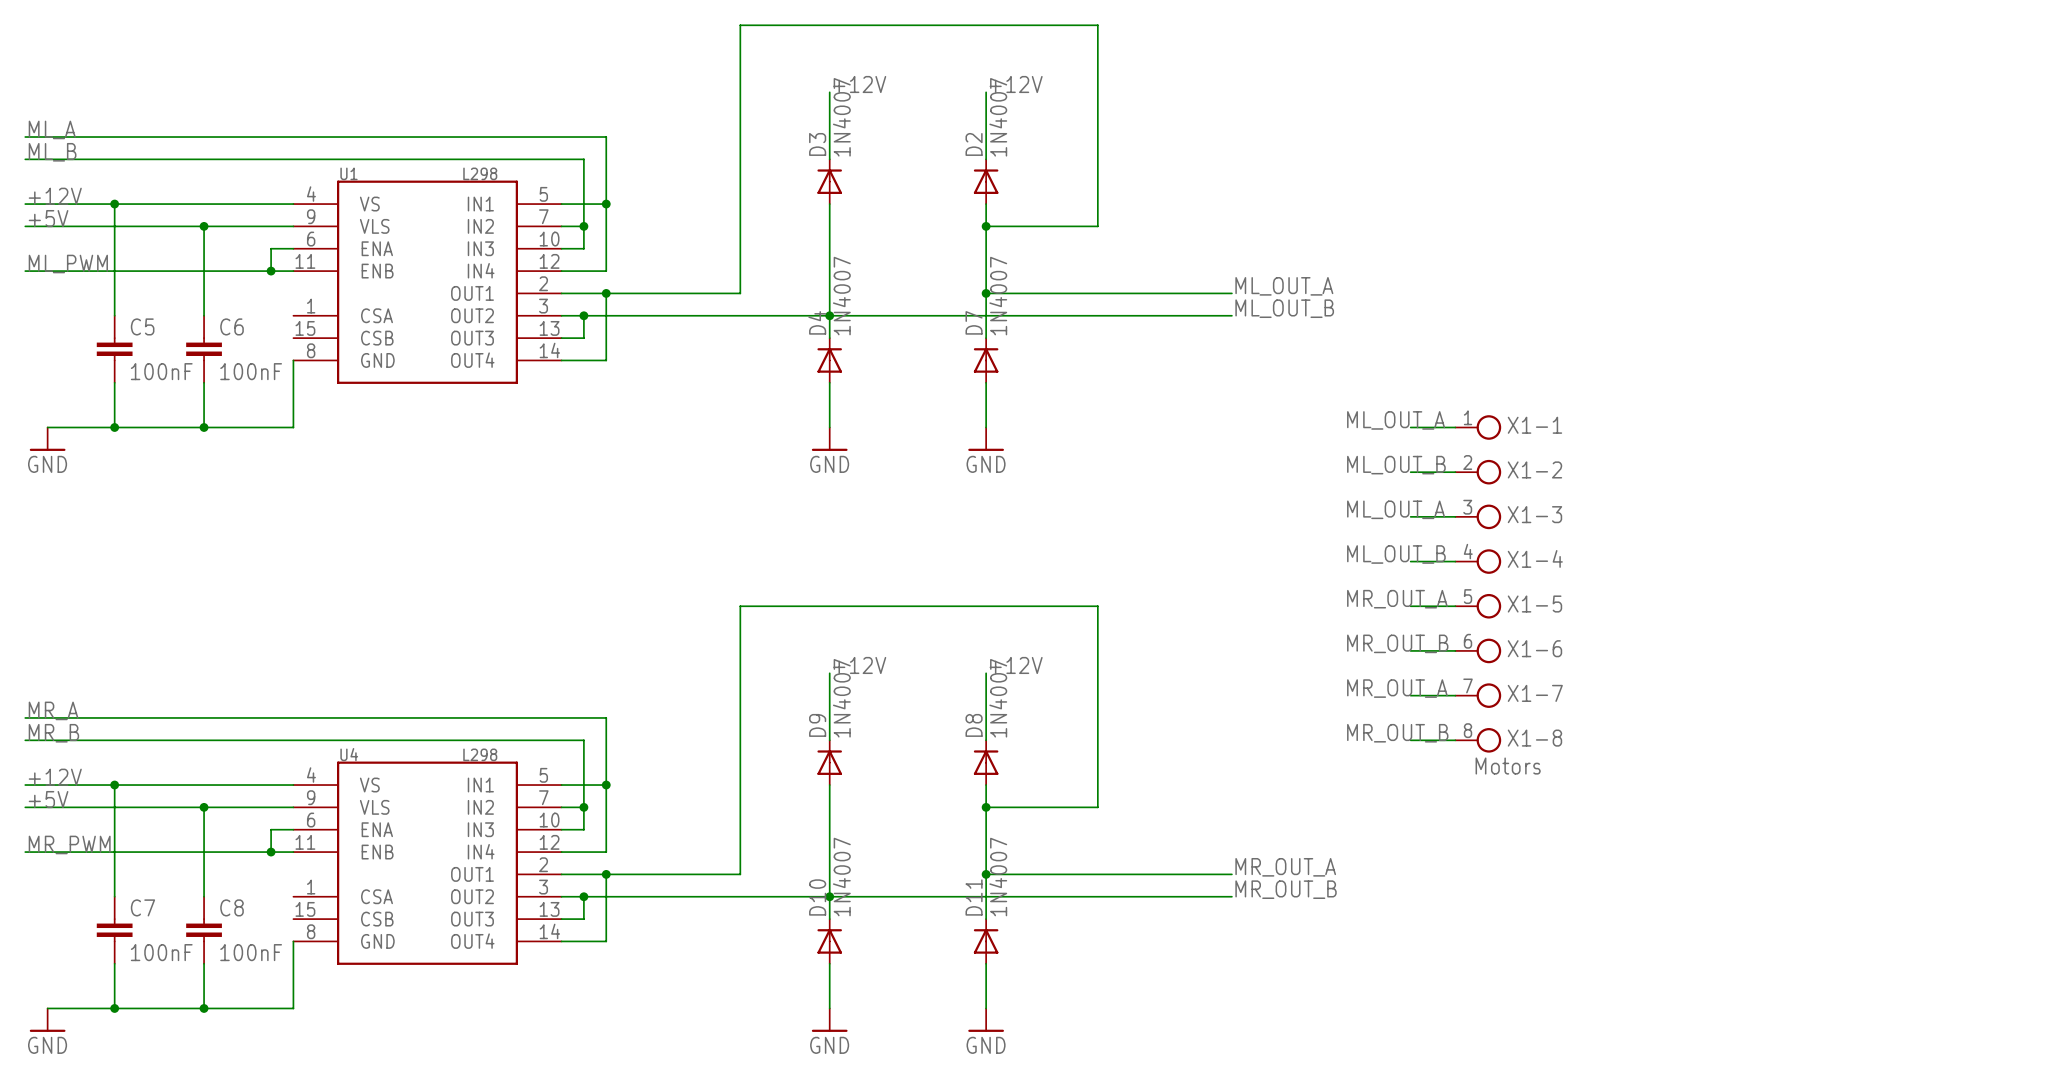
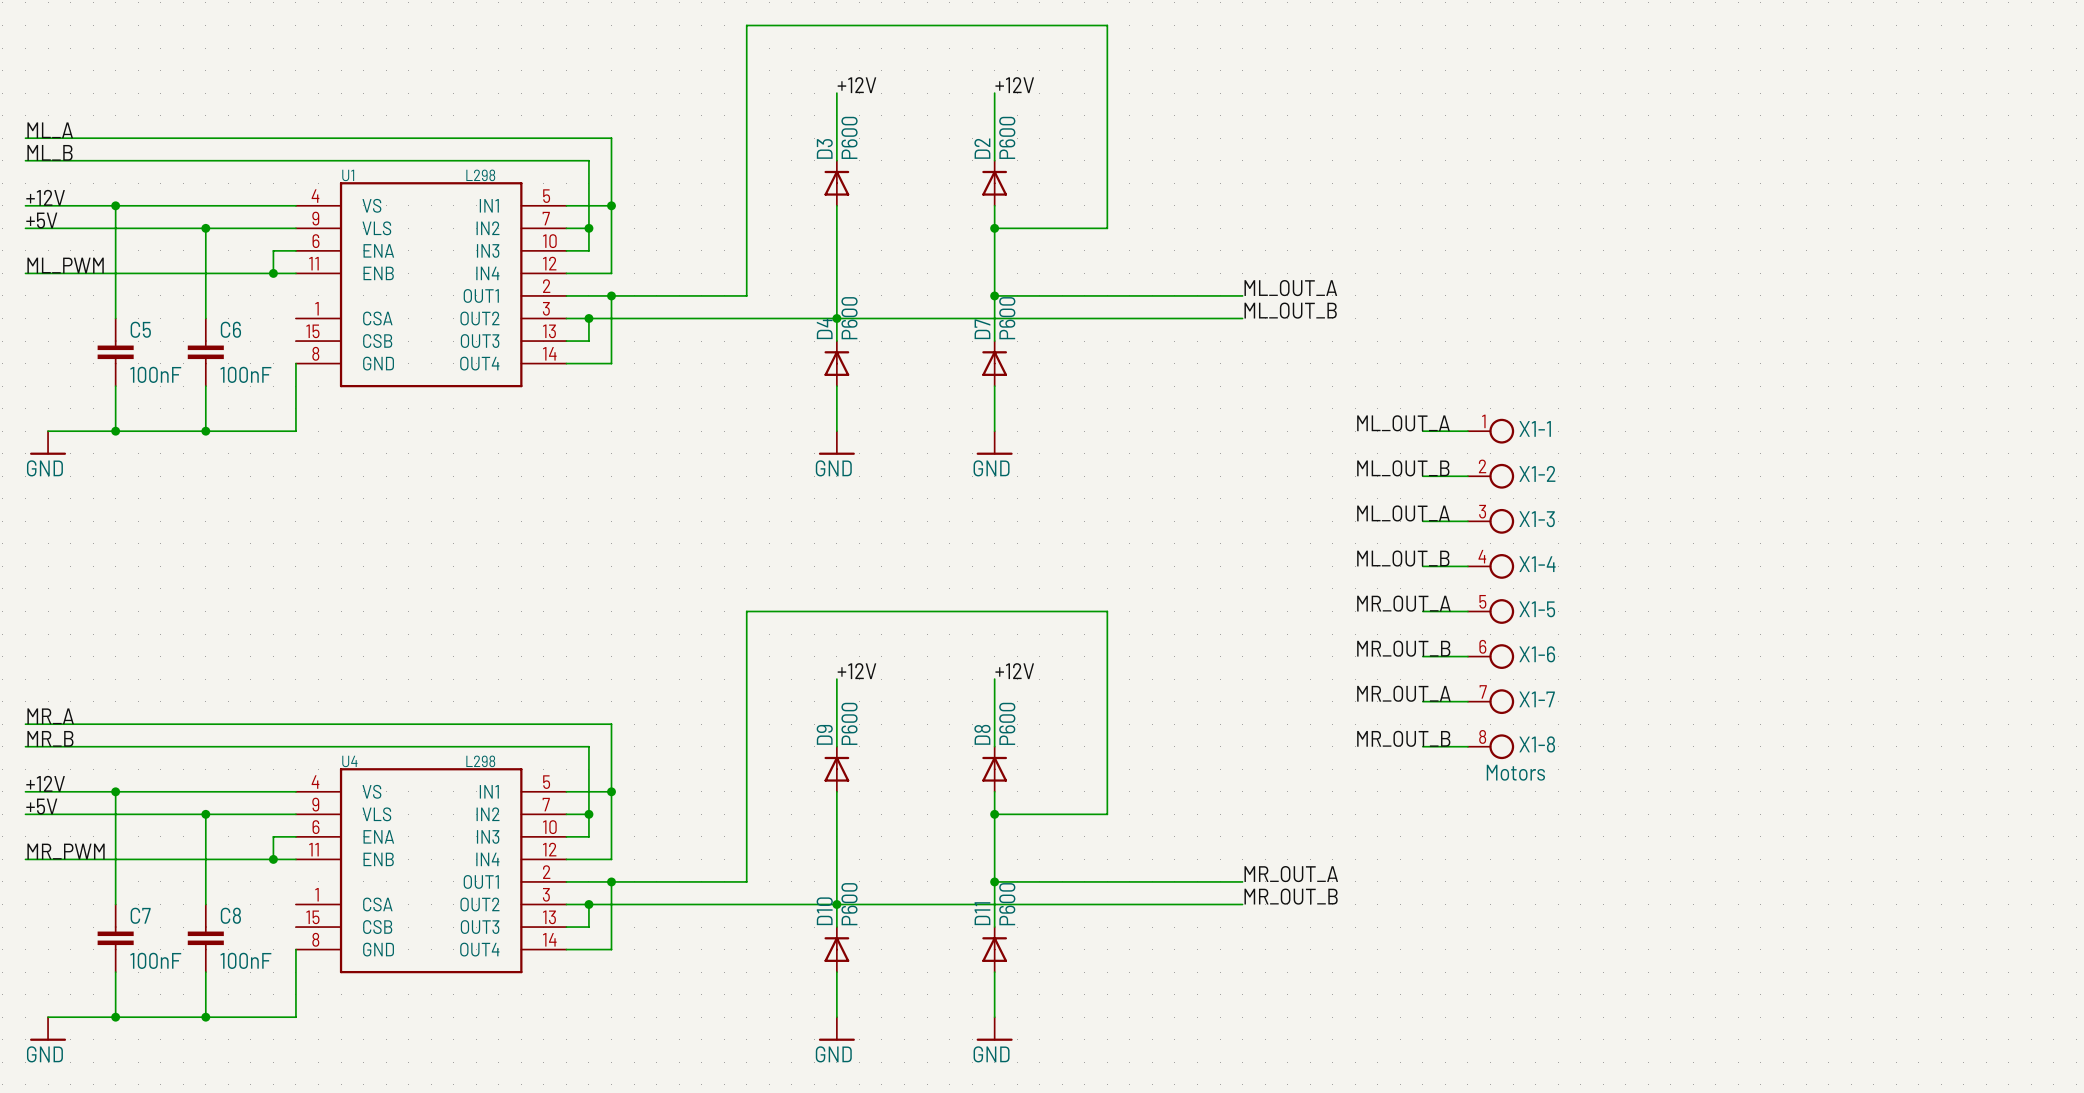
D3 value: 1N4007 (841, 117) -> P600 (849, 137)
D2 value: 1N4007 (998, 117) -> P600 (1007, 137)
D4 value: 1N4007 (841, 296) -> P600 (849, 318)
D7 value: 1N4007 (998, 296) -> P600 (1007, 318)
D9 value: 1N4007 (841, 698) -> P600 (849, 723)
D8 value: 1N4007 (998, 698) -> P600 (1007, 723)
D10 value: 1N4007 (841, 877) -> P600 (849, 904)
D11 value: 1N4007 (998, 877) -> P600 (1007, 904)

